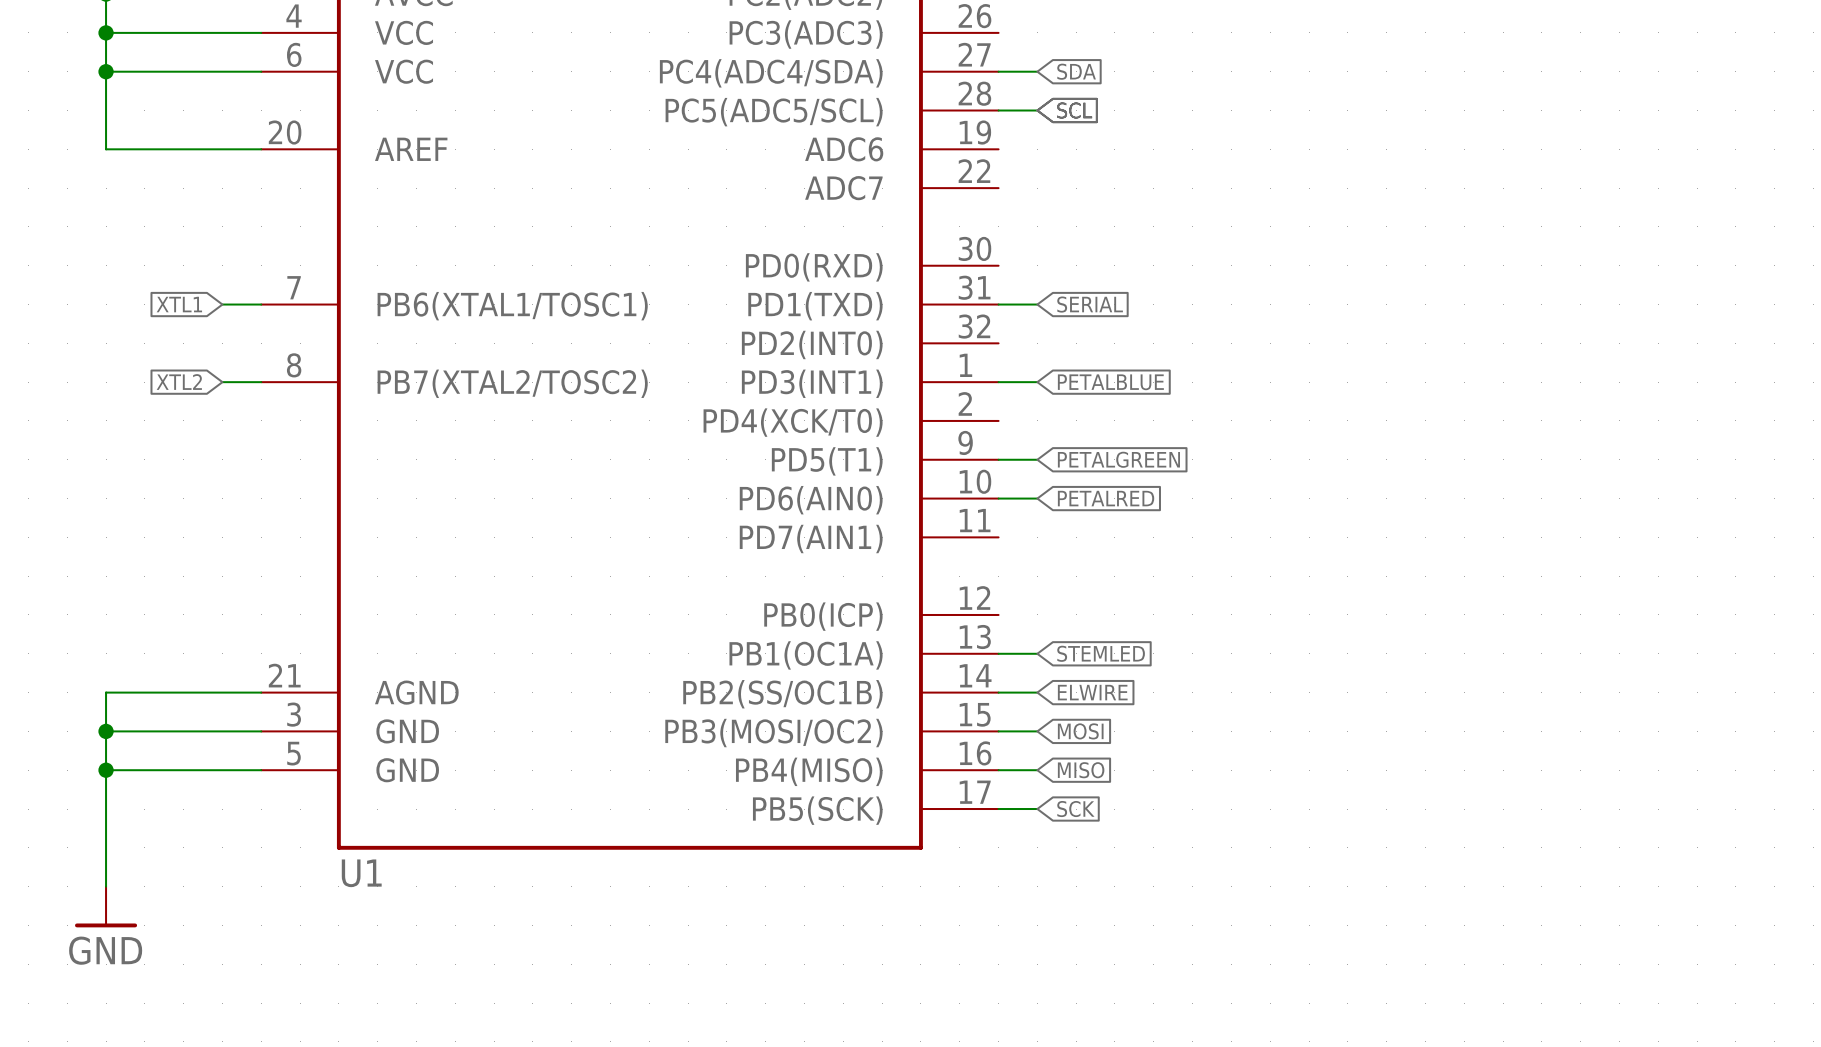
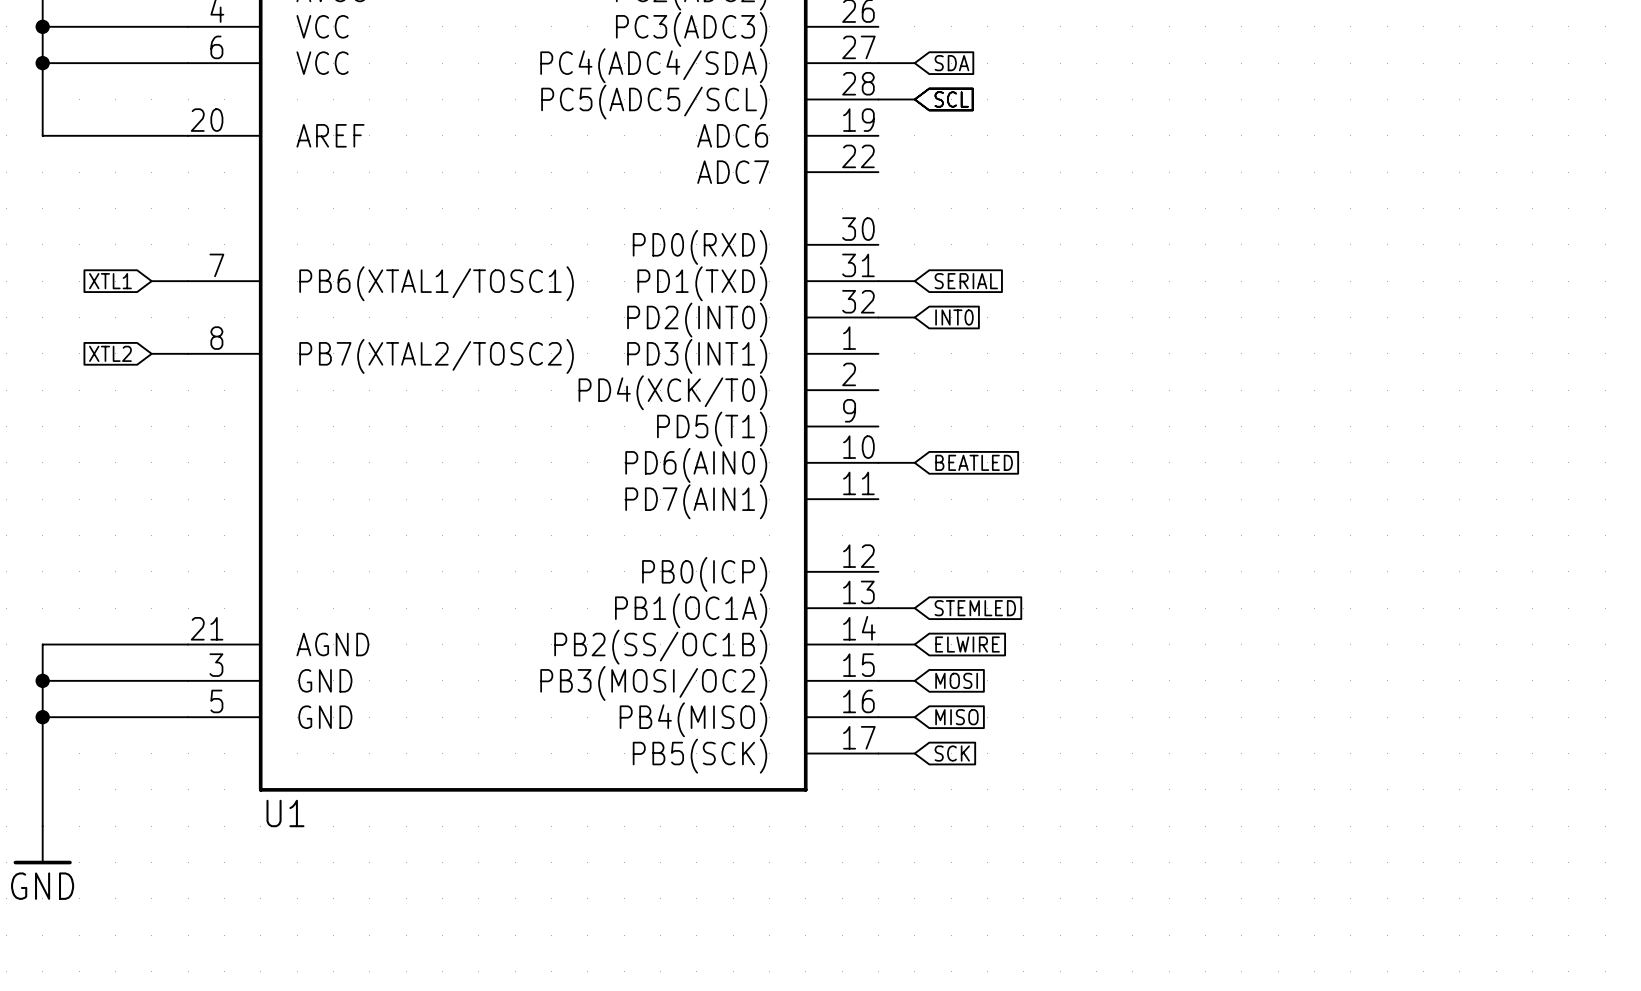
global label: none -> INT0 (954, 317)
wire: (998, 382) (1037, 382) -> (878, 317) (914, 317)
global label: PETALBLUE (1110, 382) -> none
wire: (998, 459) (1037, 459) -> none
global label: PETALGREEN (1118, 459) -> none
global label: PETALRED (1106, 498) -> BEATLED (974, 462)

